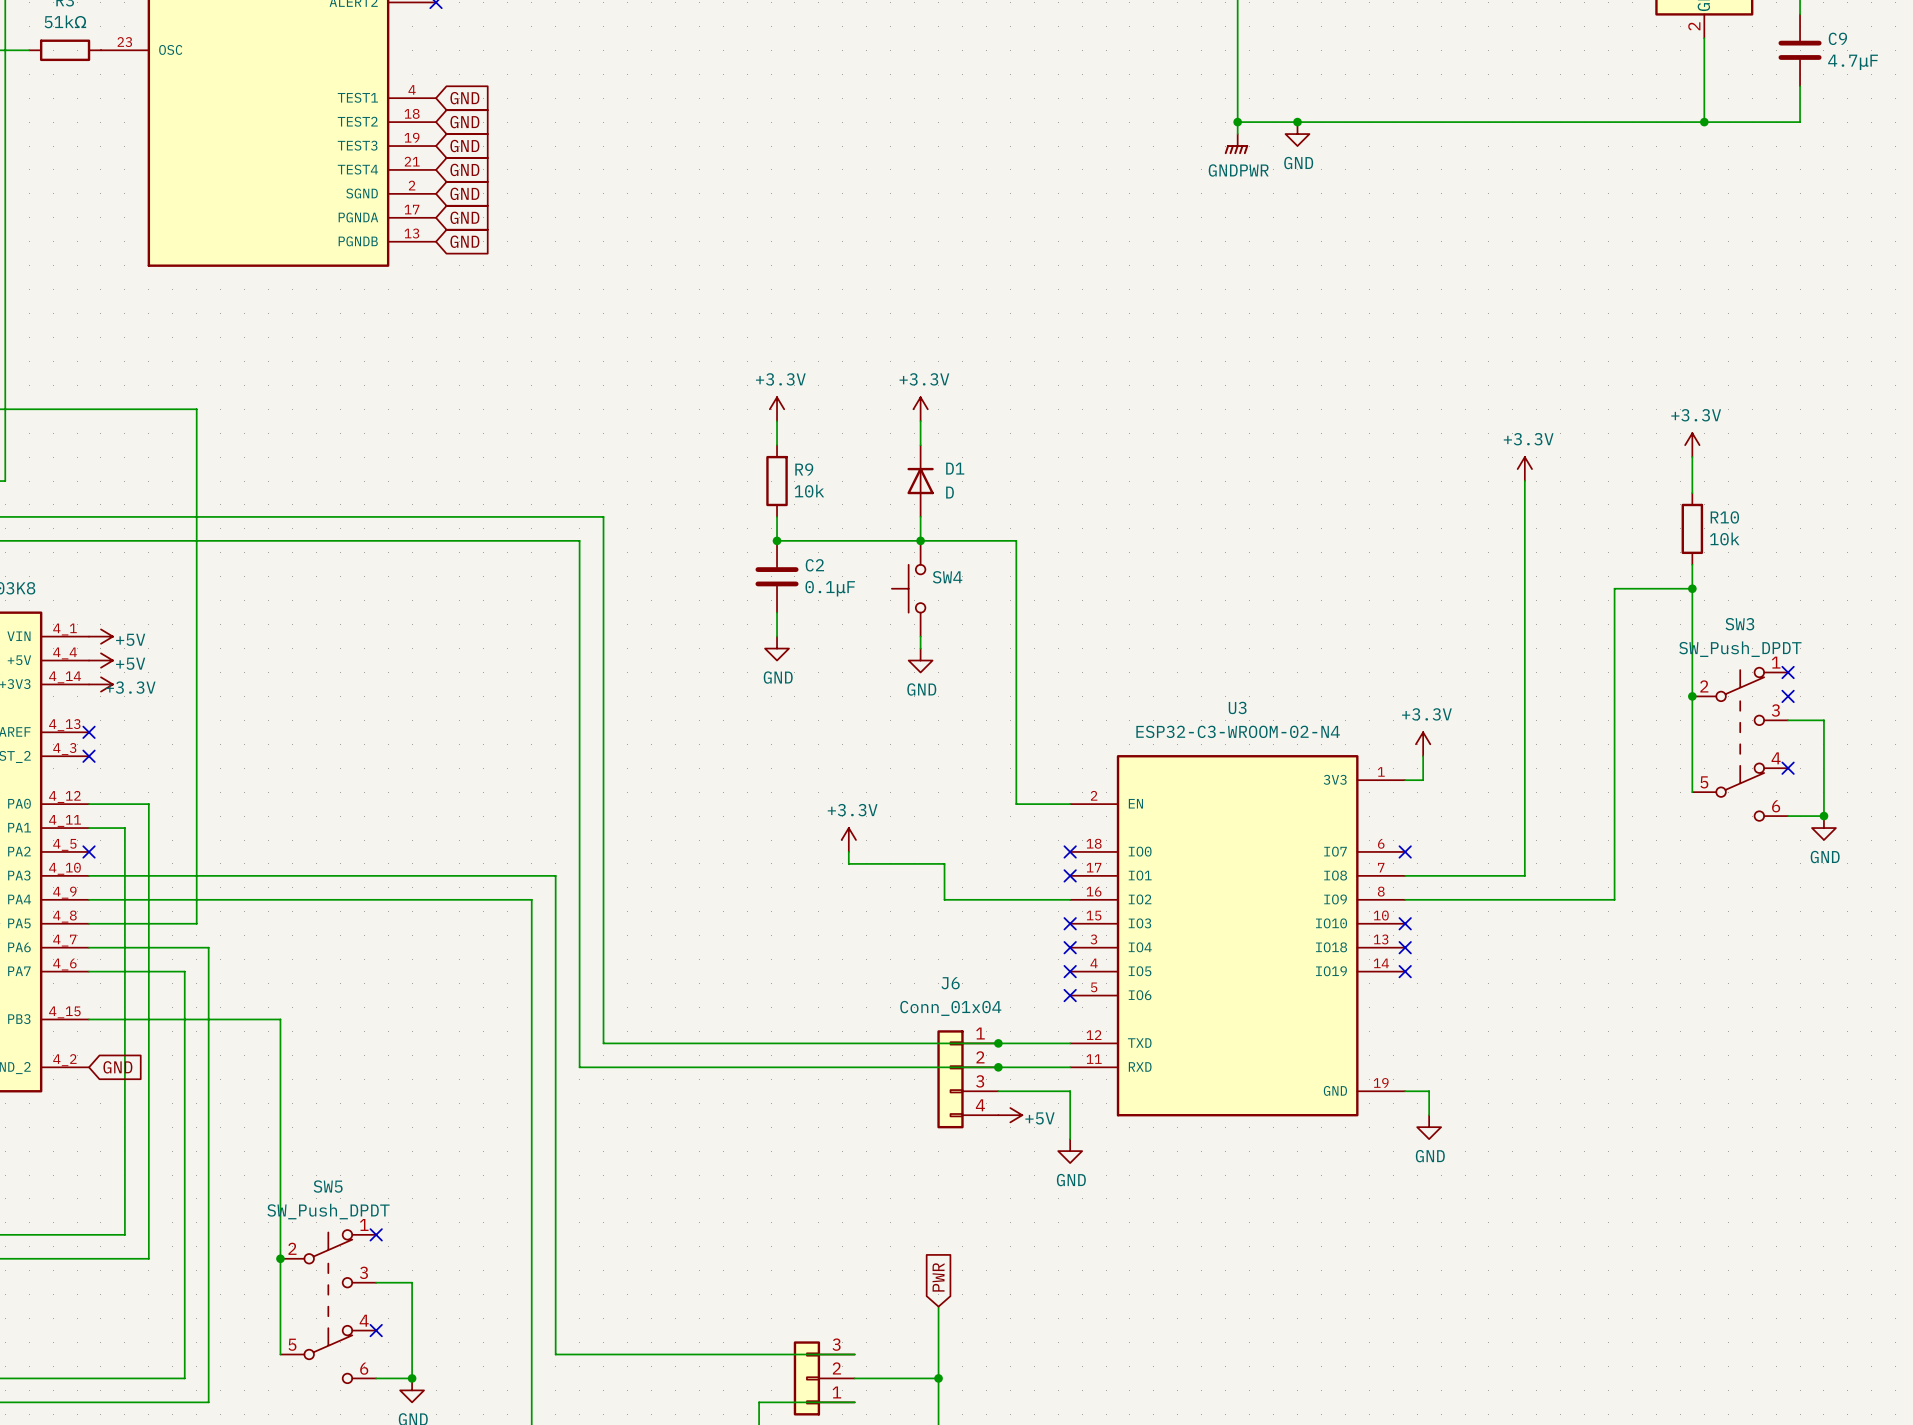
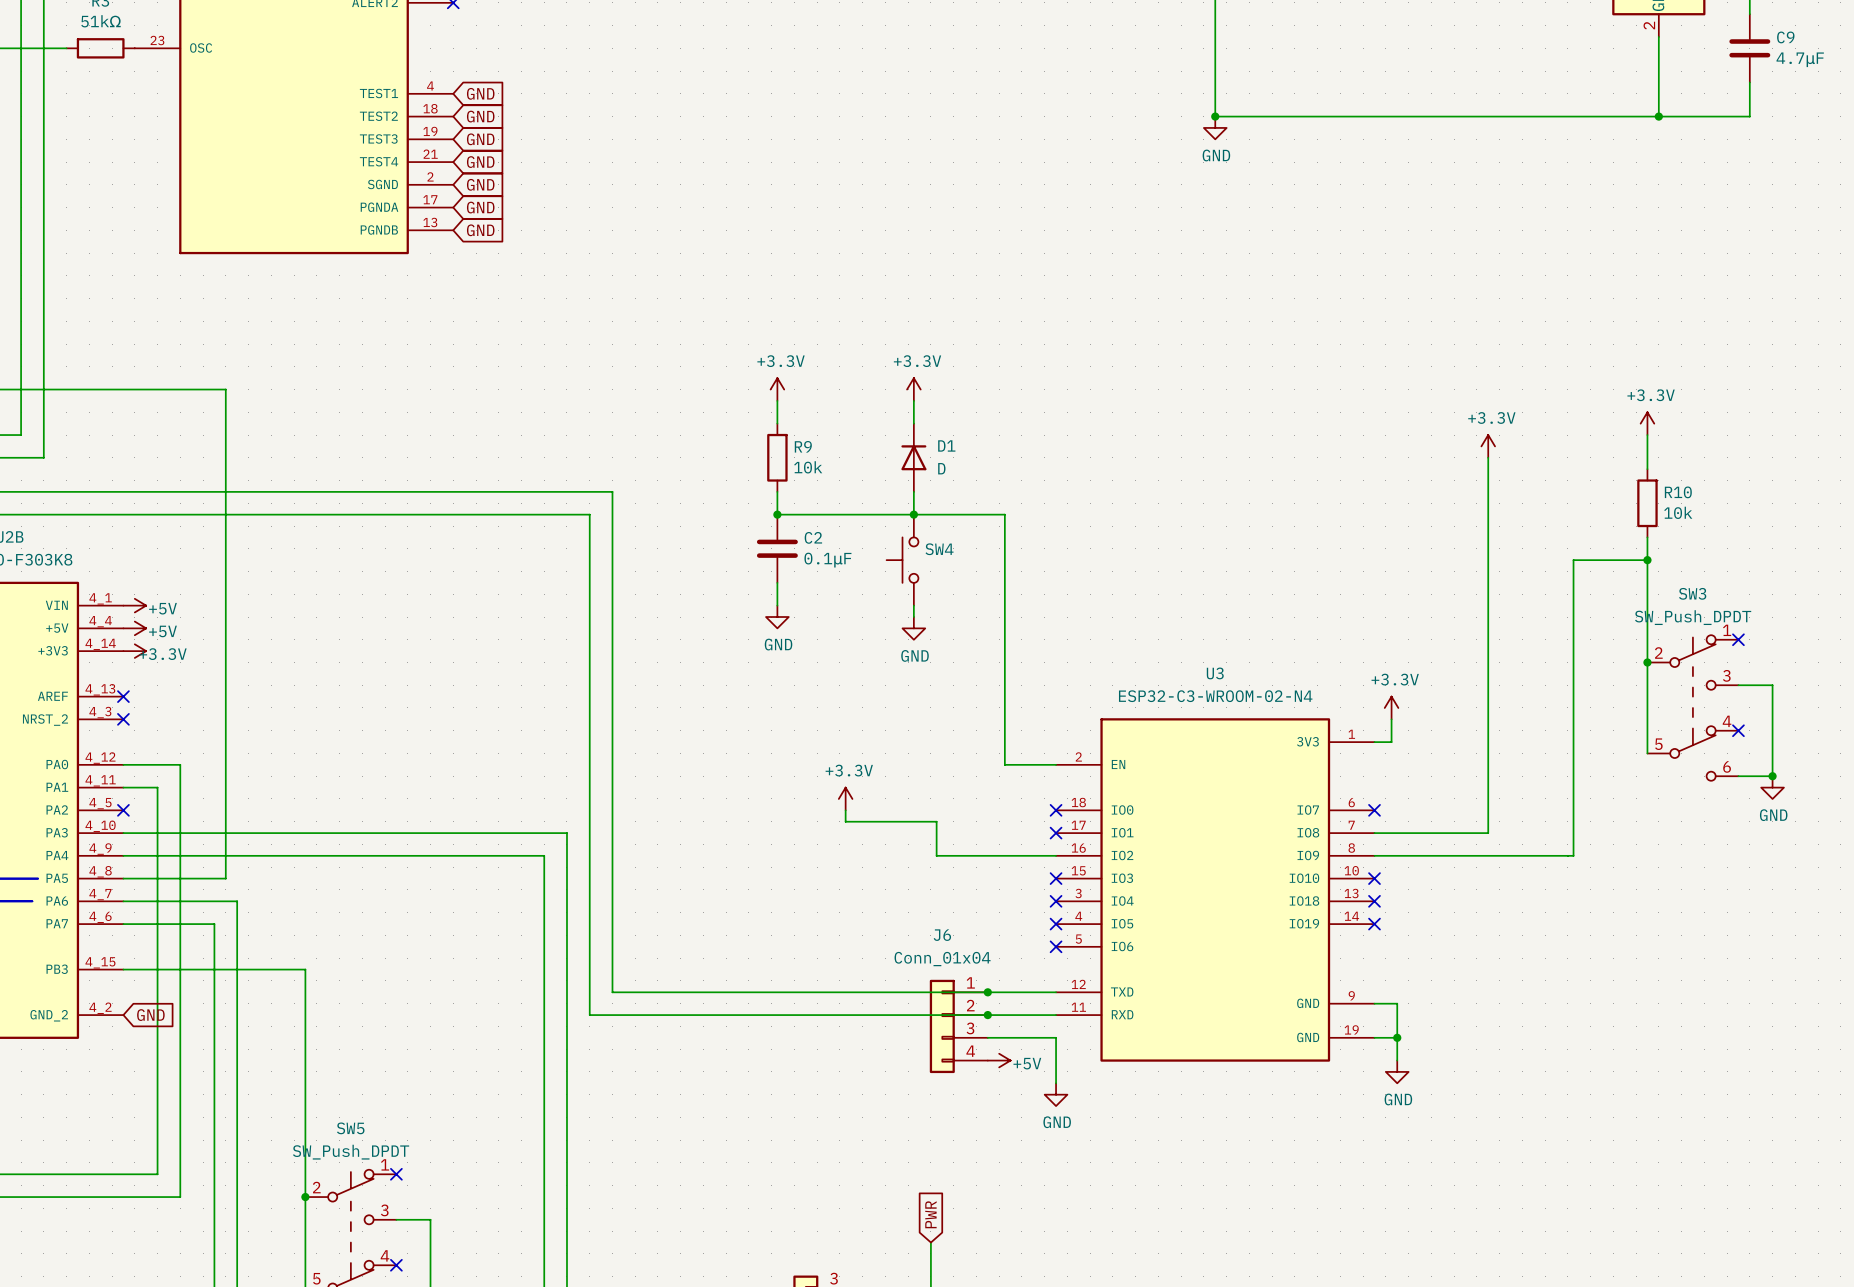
junction: (1297, 122) -> none
power symbol position: GND (1297, 134) -> GND (1215, 127)
power symbol: GNDPWR (1236, 144) -> none
no-connect mark: (1788, 696) -> none
U3 symbol: [1070, 755, 1406, 1117] -> [1056, 718, 1375, 1062]
wire: none -> (1374, 1003) (1397, 1003) (1397, 1037)
junction: none -> (1397, 1037)

